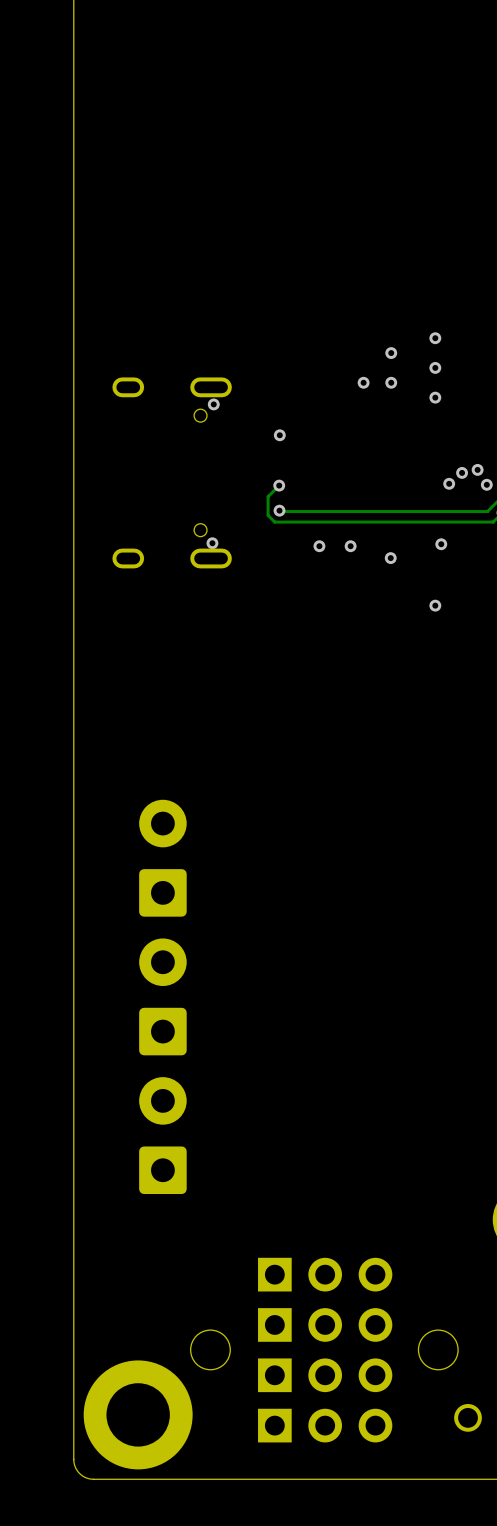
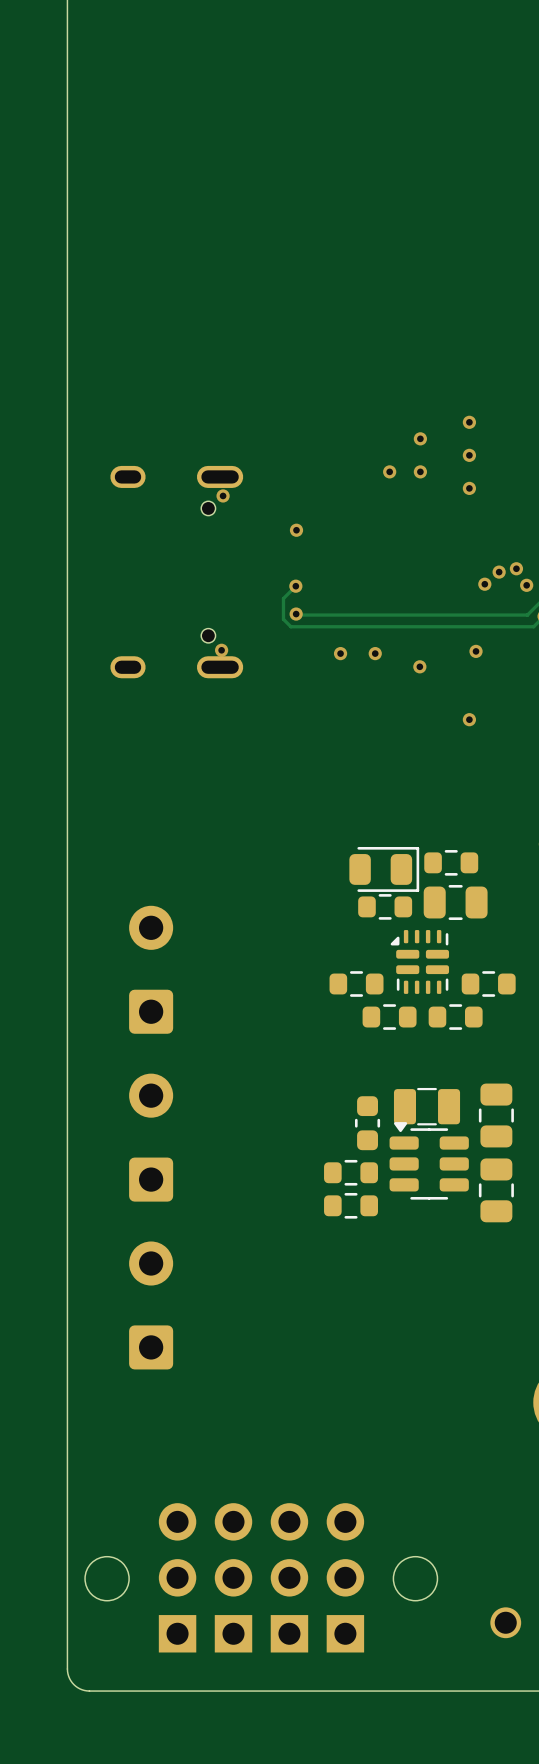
part: none -> (451, 862)
part: none -> (384, 869)
part: none -> (455, 902)
part: none -> (385, 906)
part: none -> (419, 961)
part: none -> (151, 969)
part: none -> (356, 983)
part: none -> (488, 983)
part: (162, 858) -> none
part: none -> (389, 1017)
part: none -> (455, 1017)
part: none -> (427, 1106)
part: none -> (496, 1115)
part: none -> (367, 1123)
part: none -> (151, 1137)
part: (162, 996) -> none
part: none -> (429, 1160)
part: none -> (351, 1172)
part: none -> (496, 1190)
part: none -> (351, 1205)
part footprint: [139, 1077, 187, 1195] -> [129, 1241, 174, 1370]
part: (325, 1274) -> none
part: (325, 1324) -> none
drawing: [190, 1329, 459, 1371] -> none
drawing: none -> [84, 1556, 439, 1602]
part rotation: 0° (325, 1375) -> 90° counterclockwise (345, 1577)
part: none -> (177, 1577)
part: none -> (233, 1577)
part: none -> (289, 1577)
part: (138, 1414) -> none
part: (325, 1425) -> none

